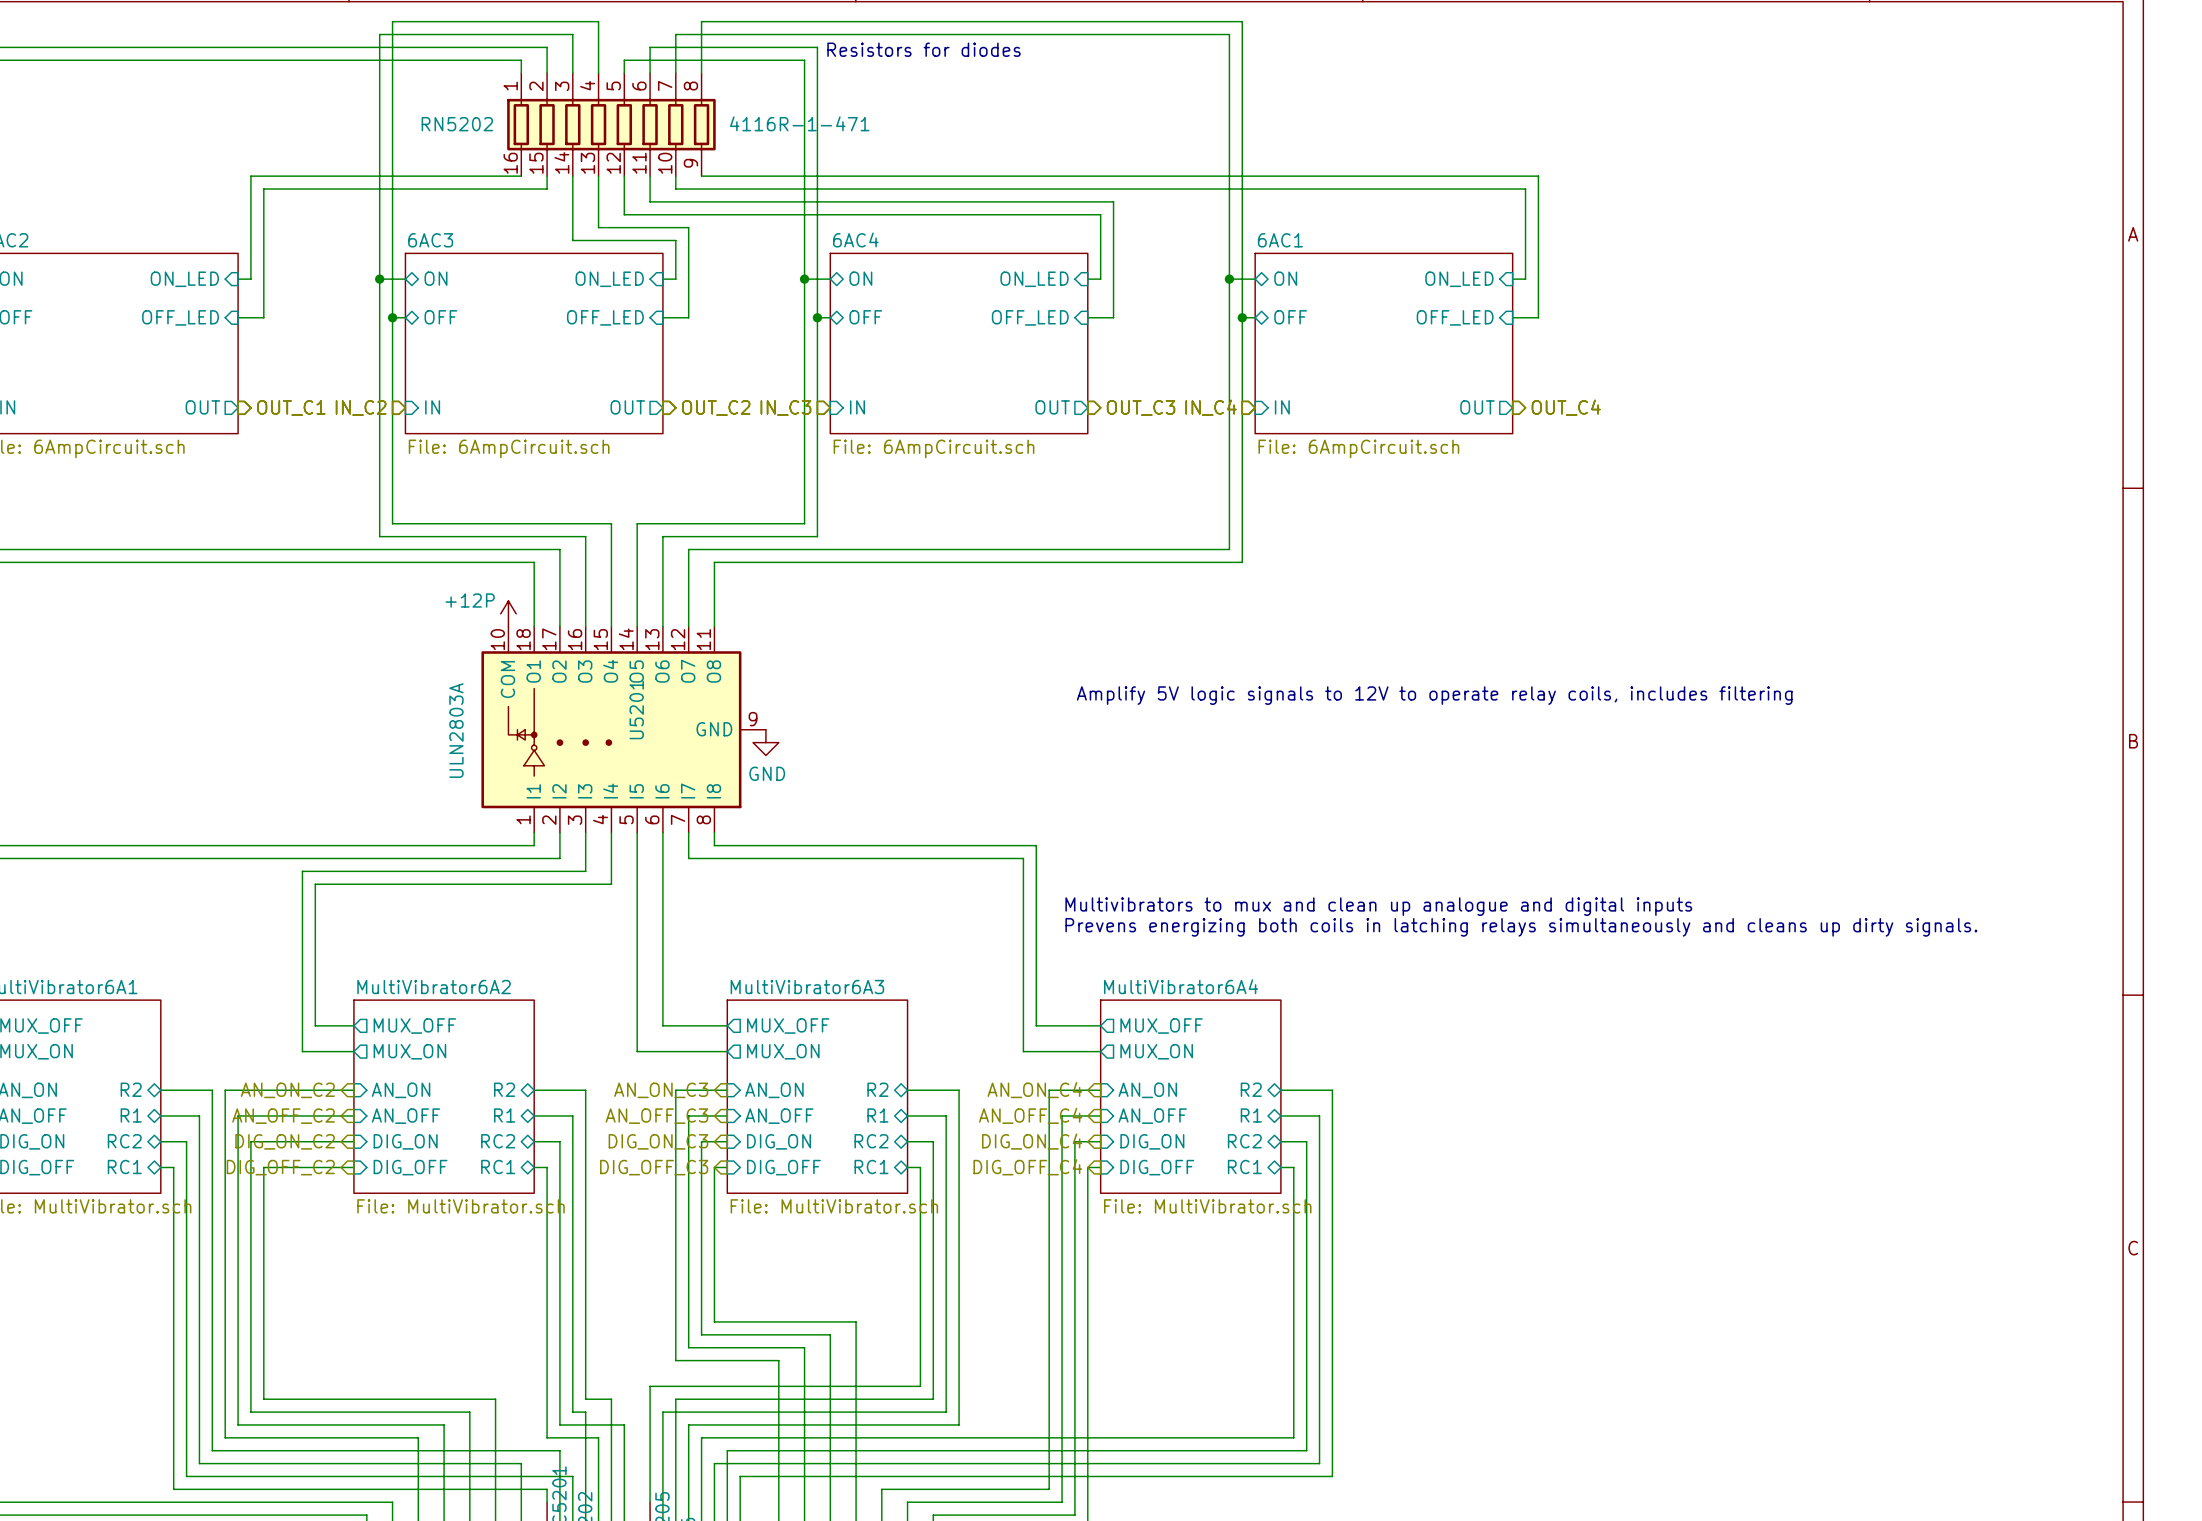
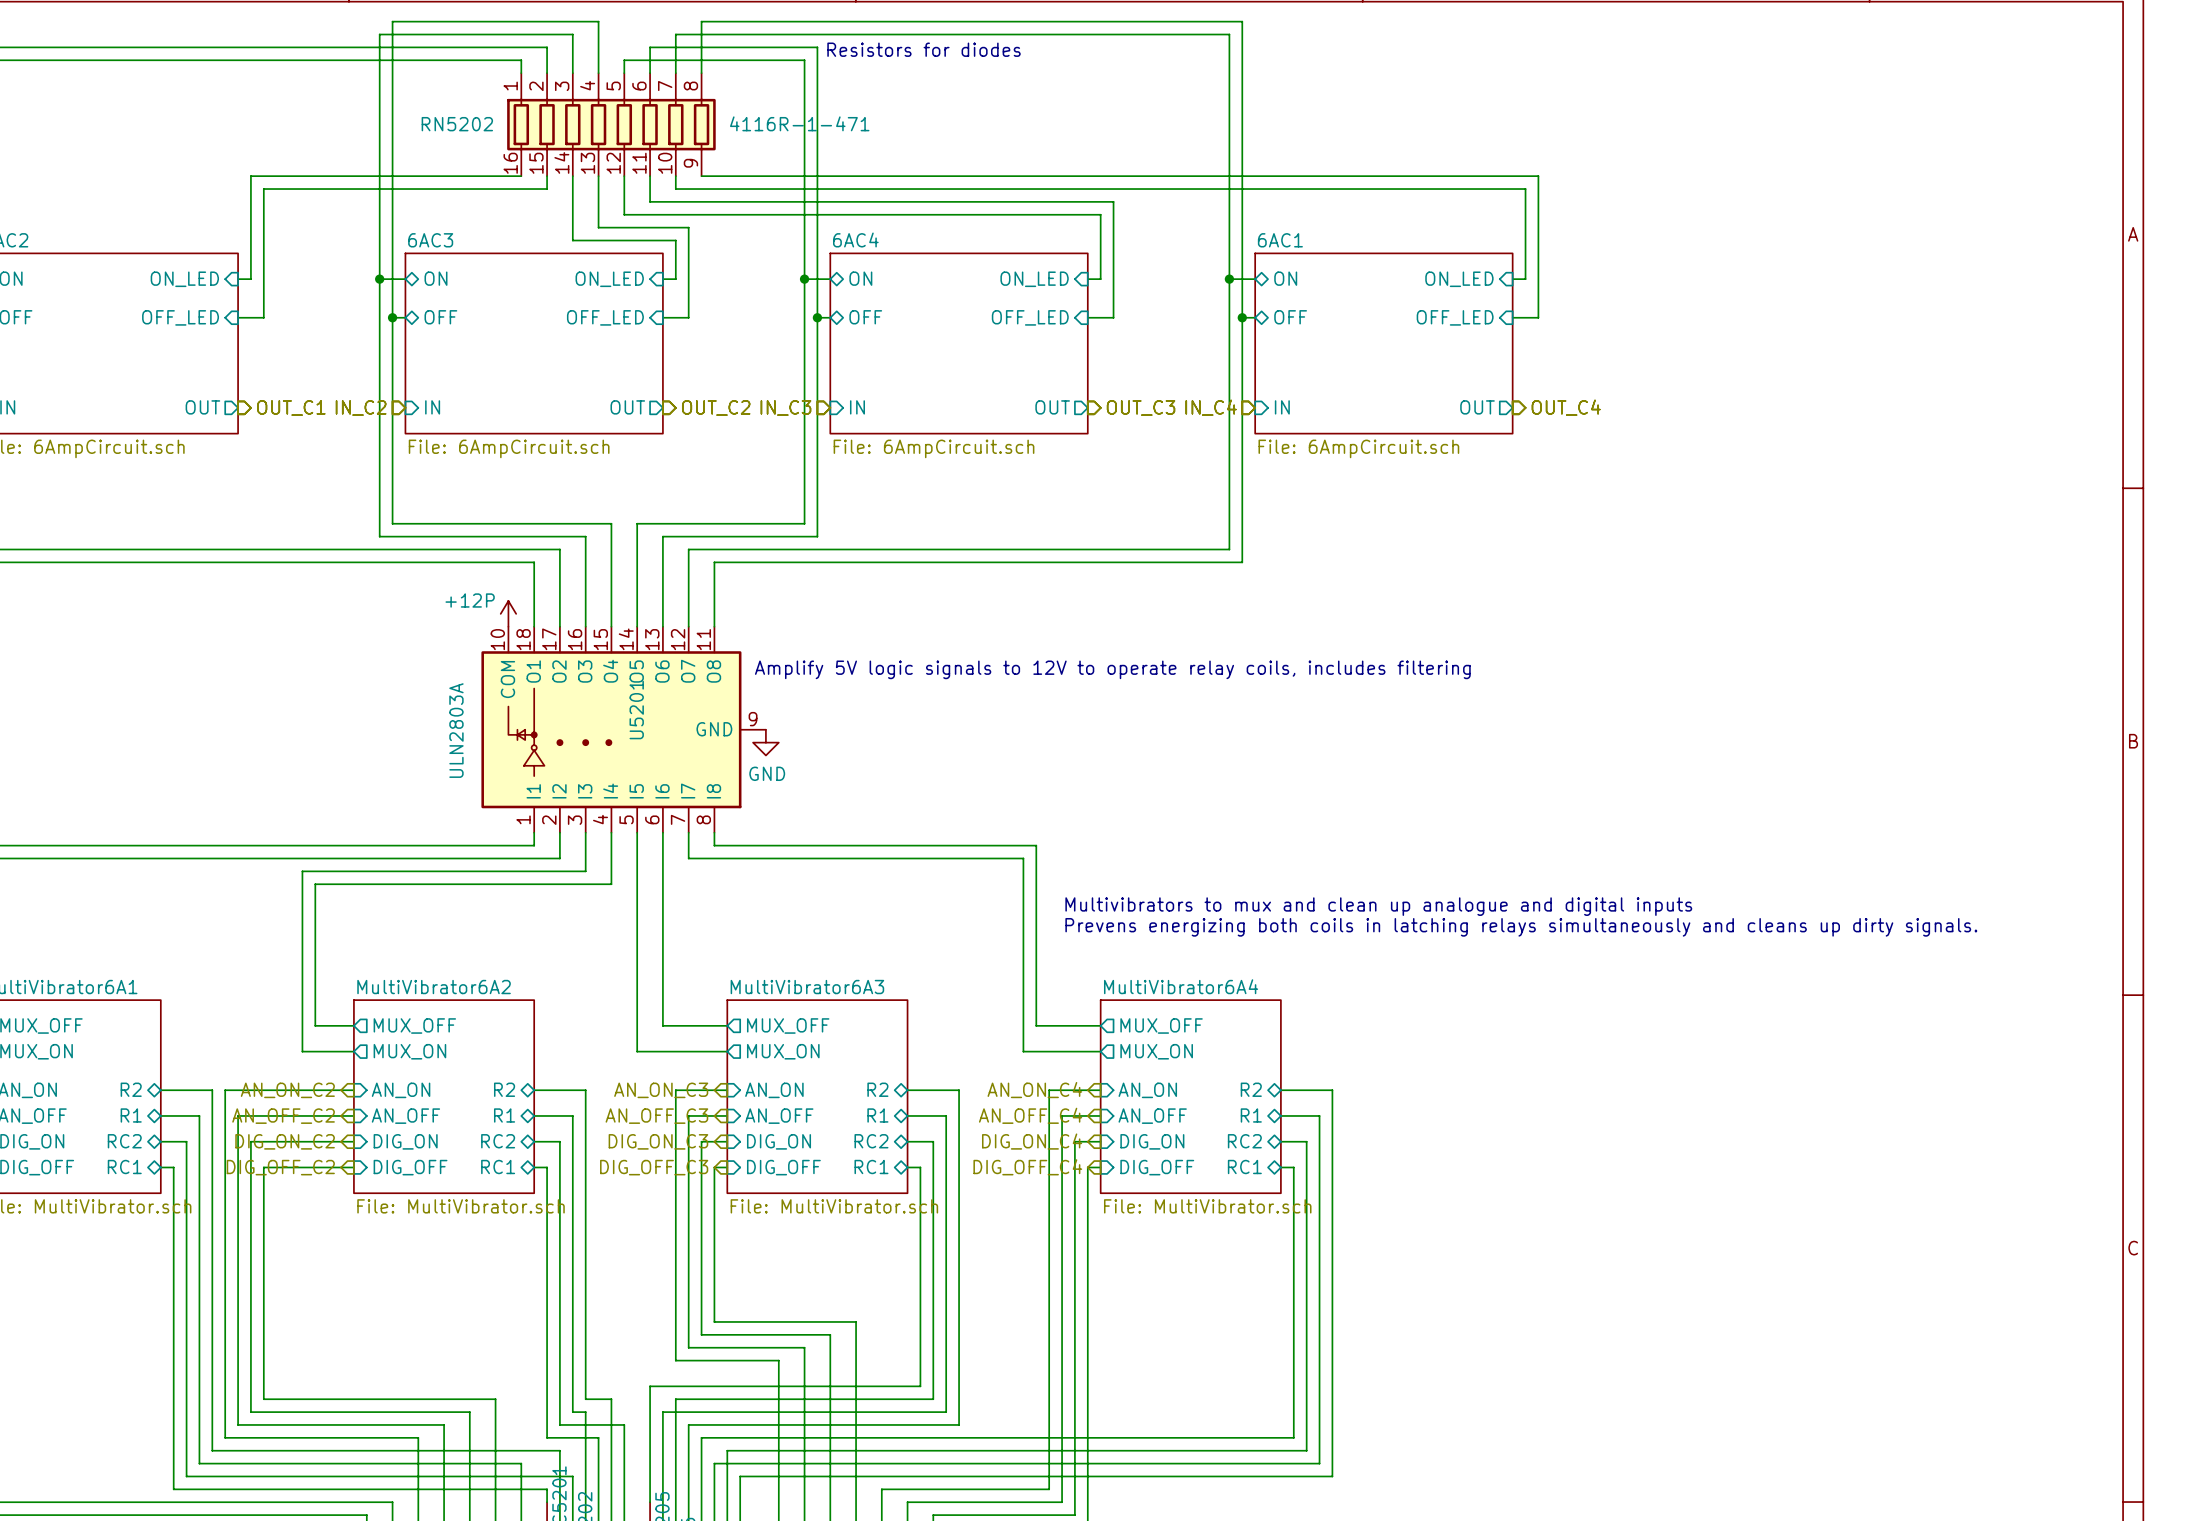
text: none -> Amplify 5V logic signals to 12V to operate relay coils, includes filtering (1112, 669)
text: Amplify 5V logic signals to 12V to operate relay coils, includes filtering (1434, 695) -> none

